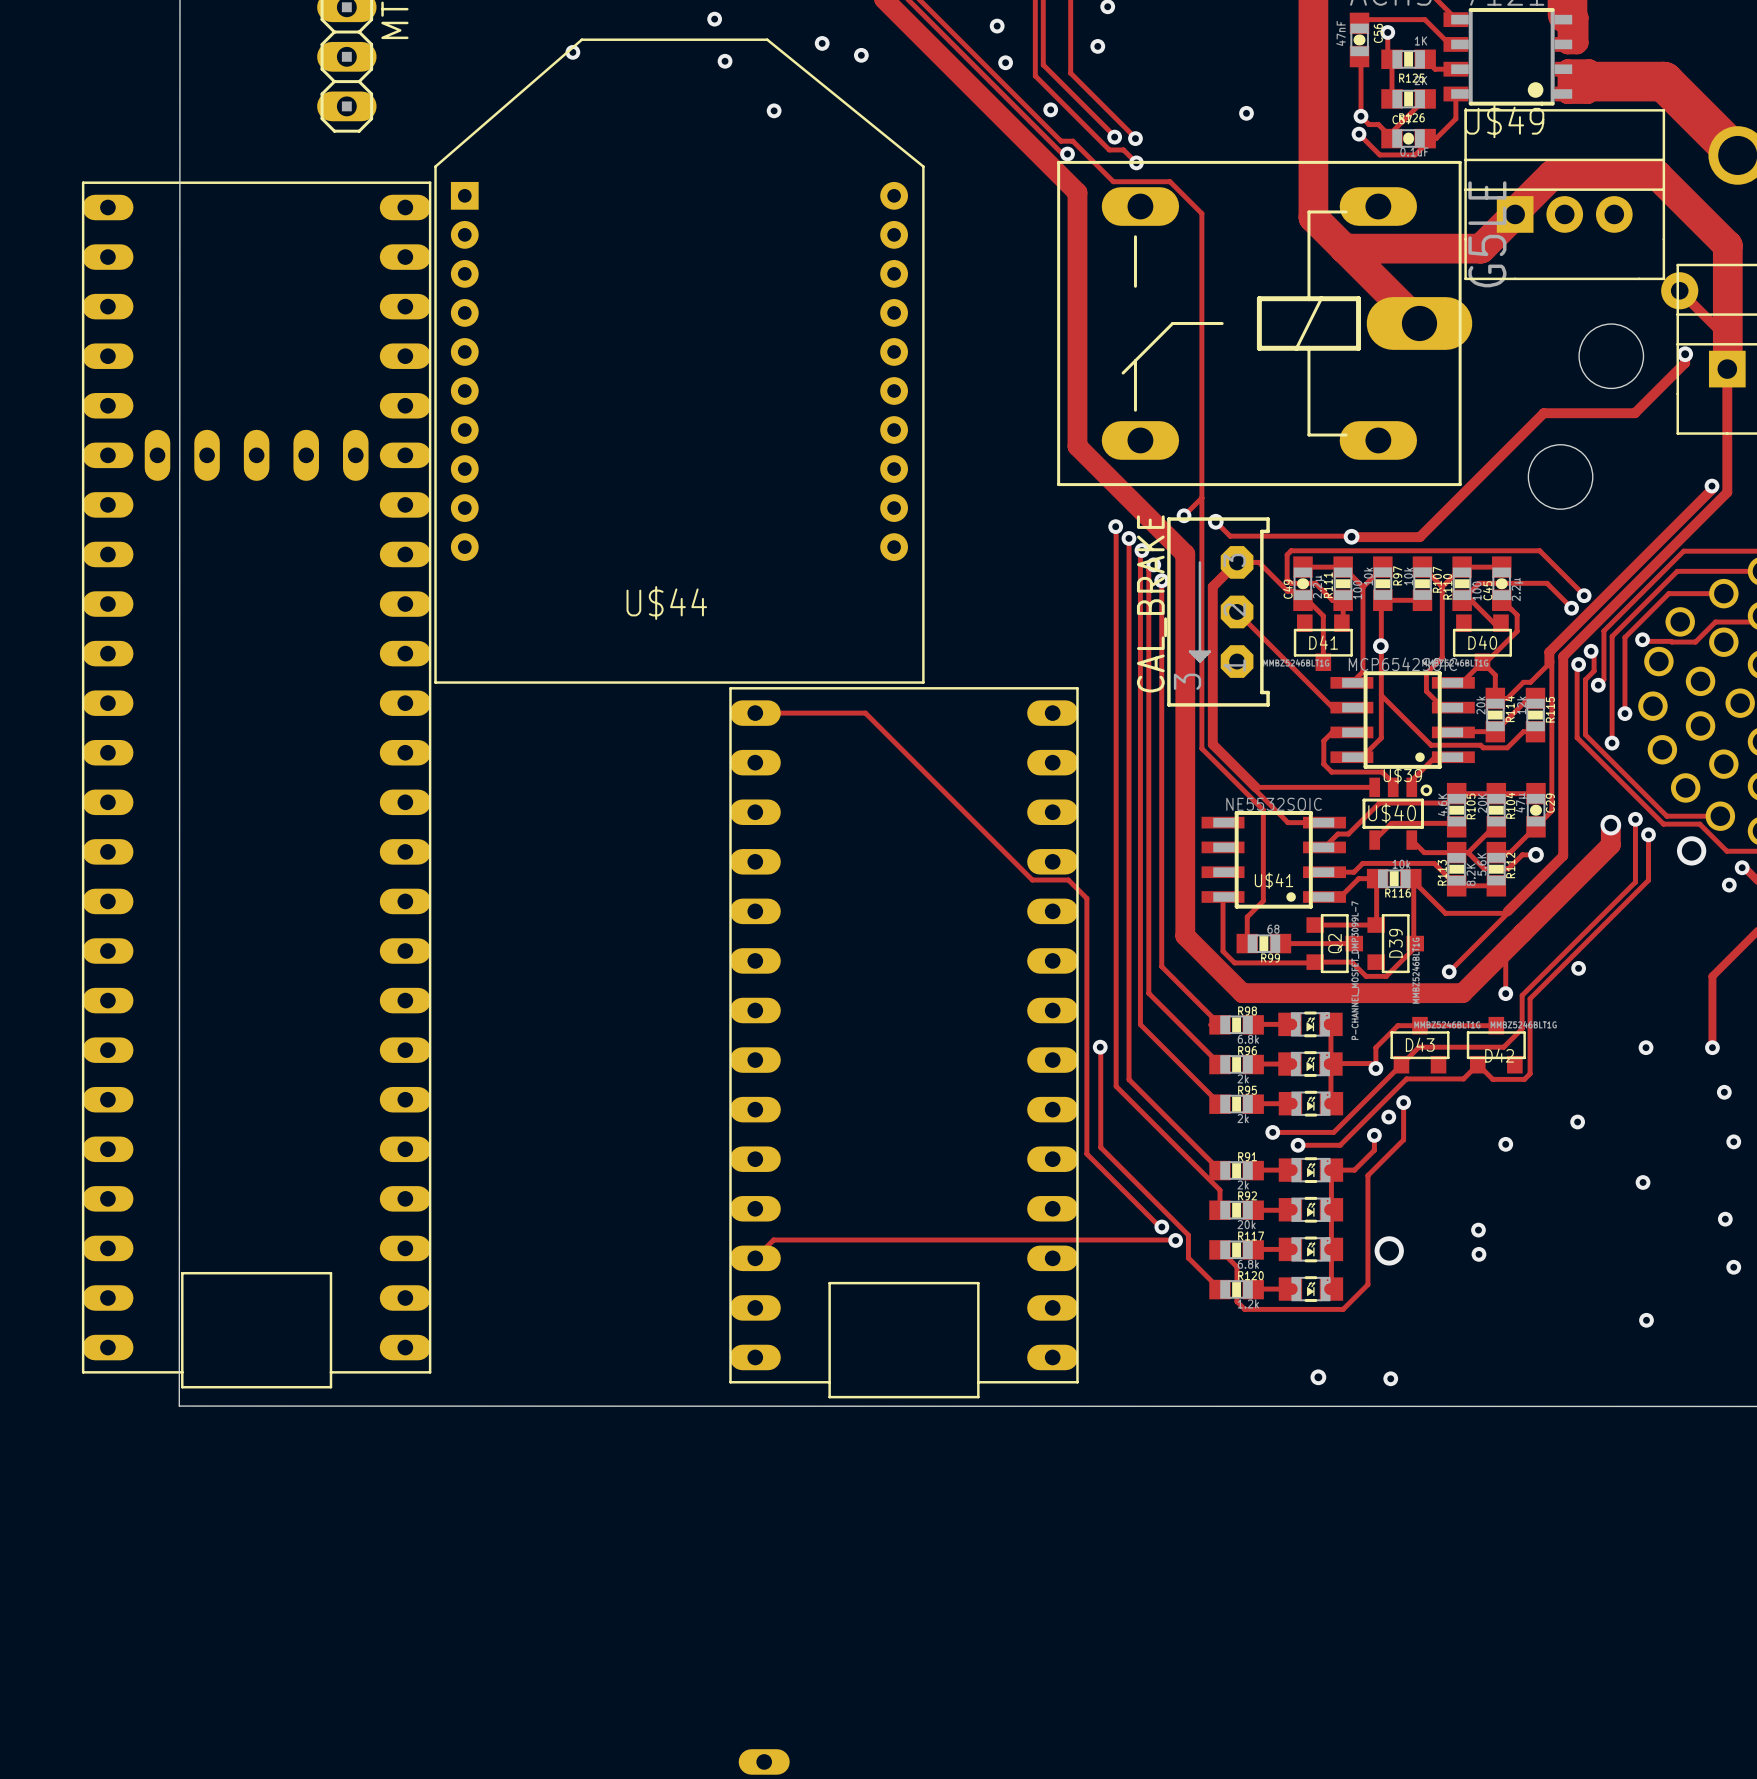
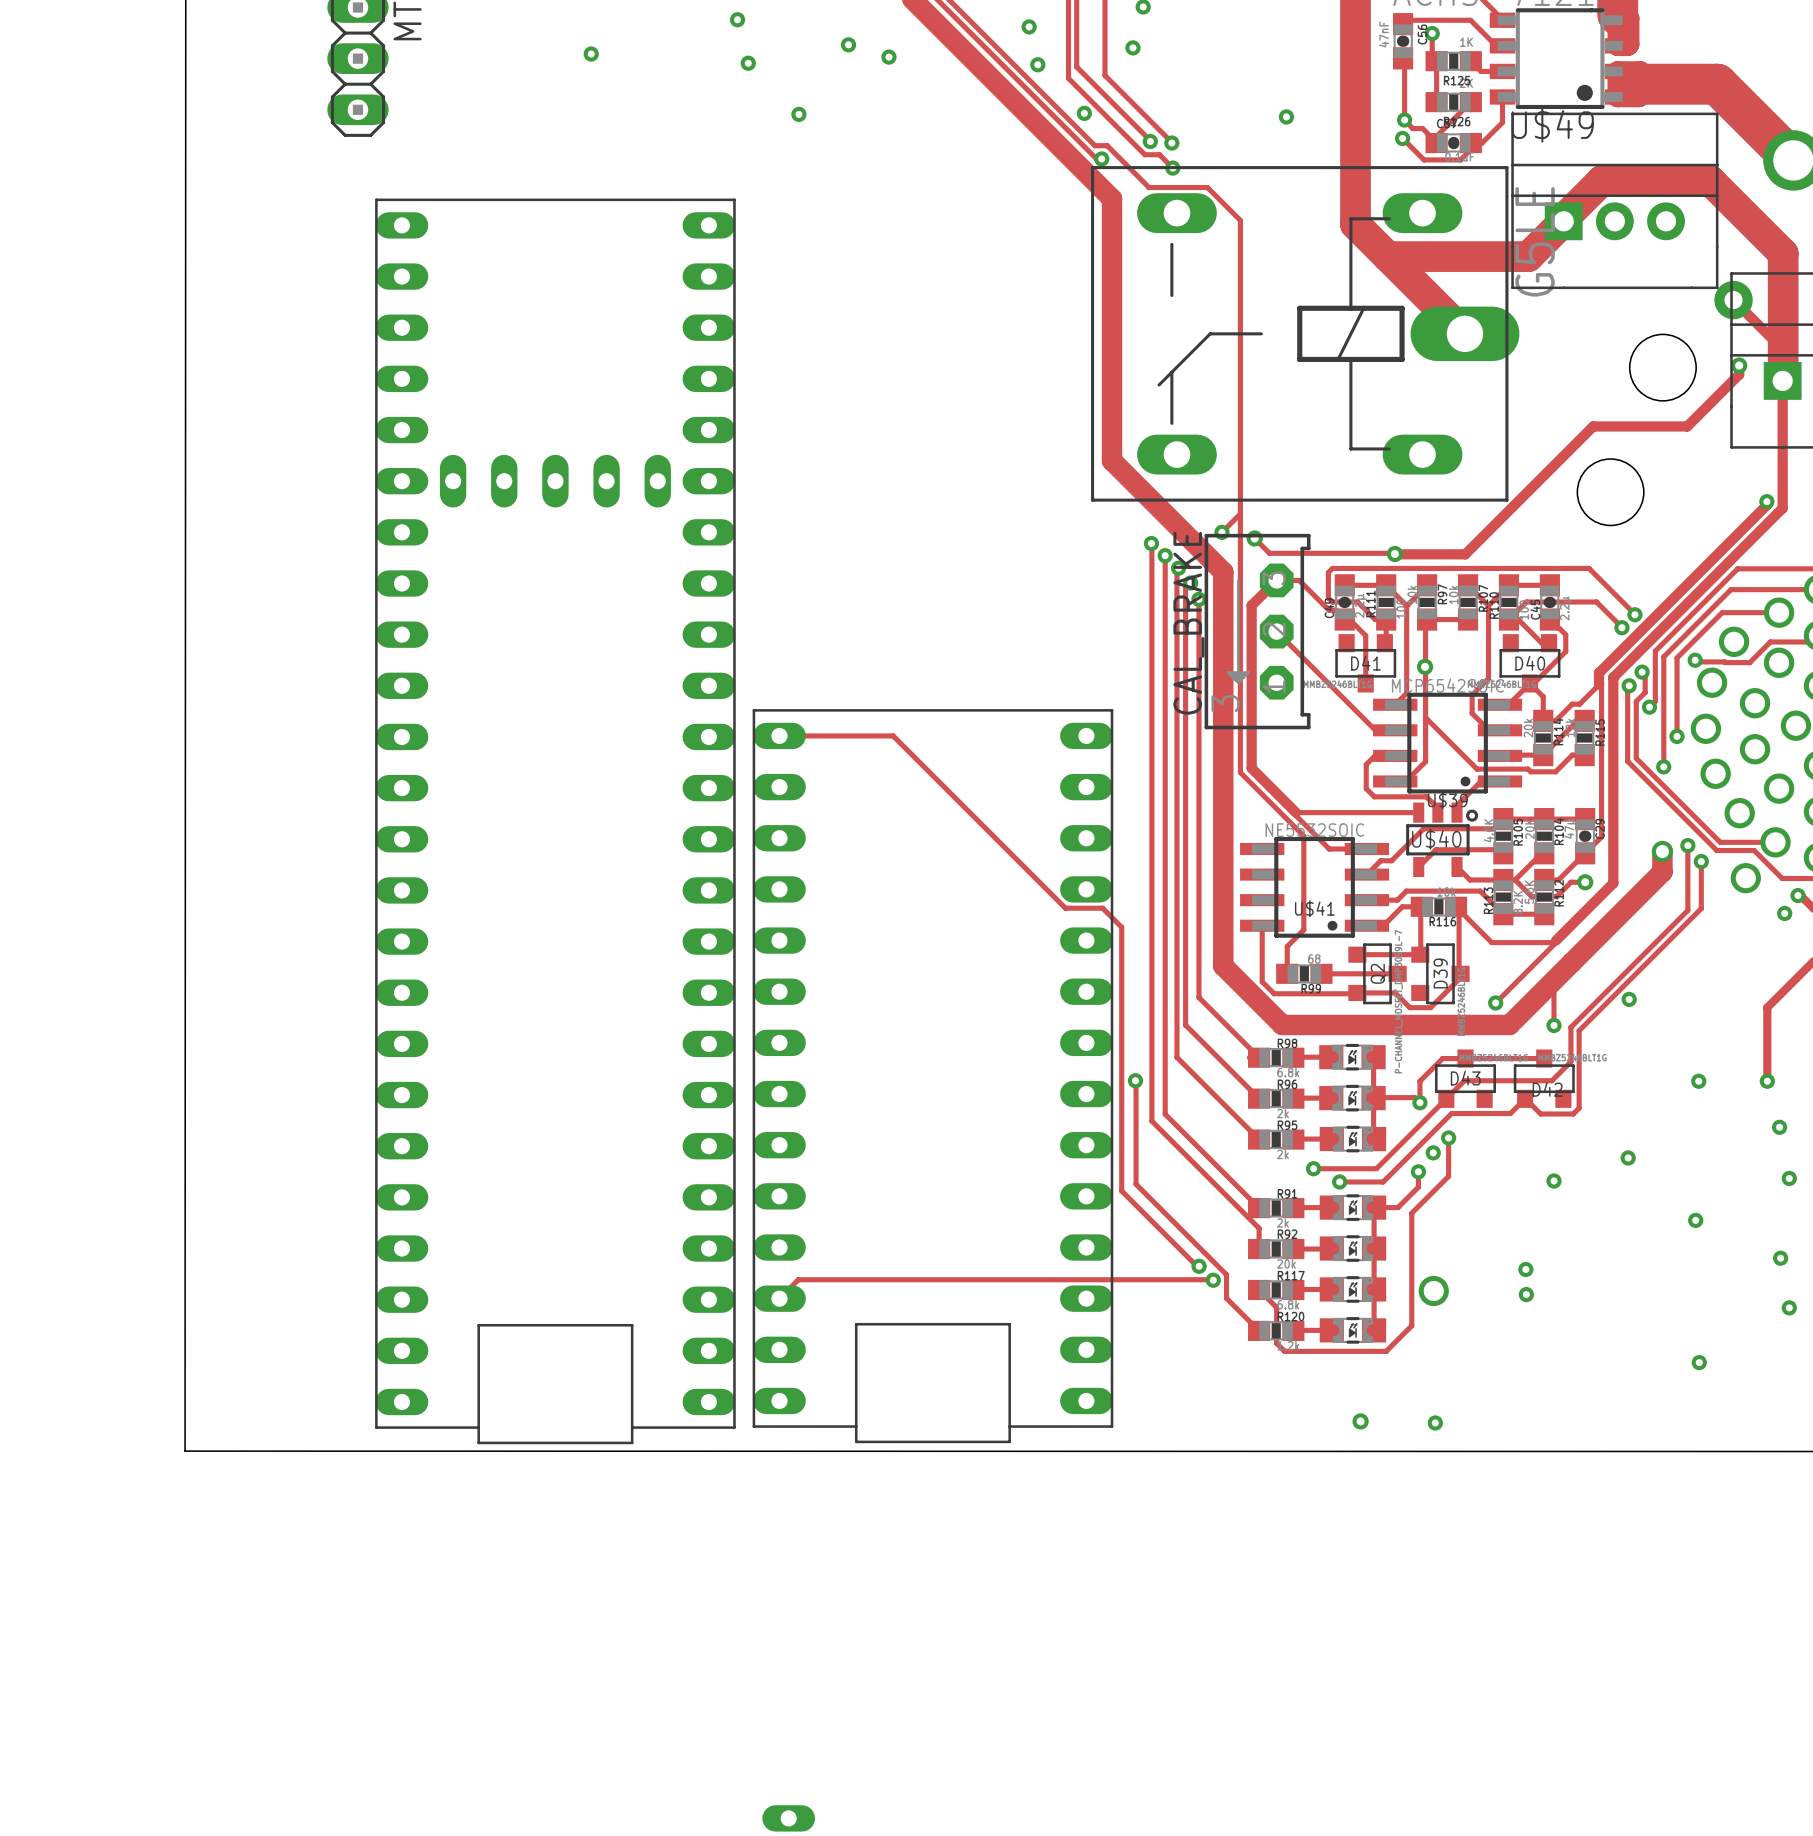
U$44: (679, 361) -> none
part position: (256, 784) -> (555, 821)

